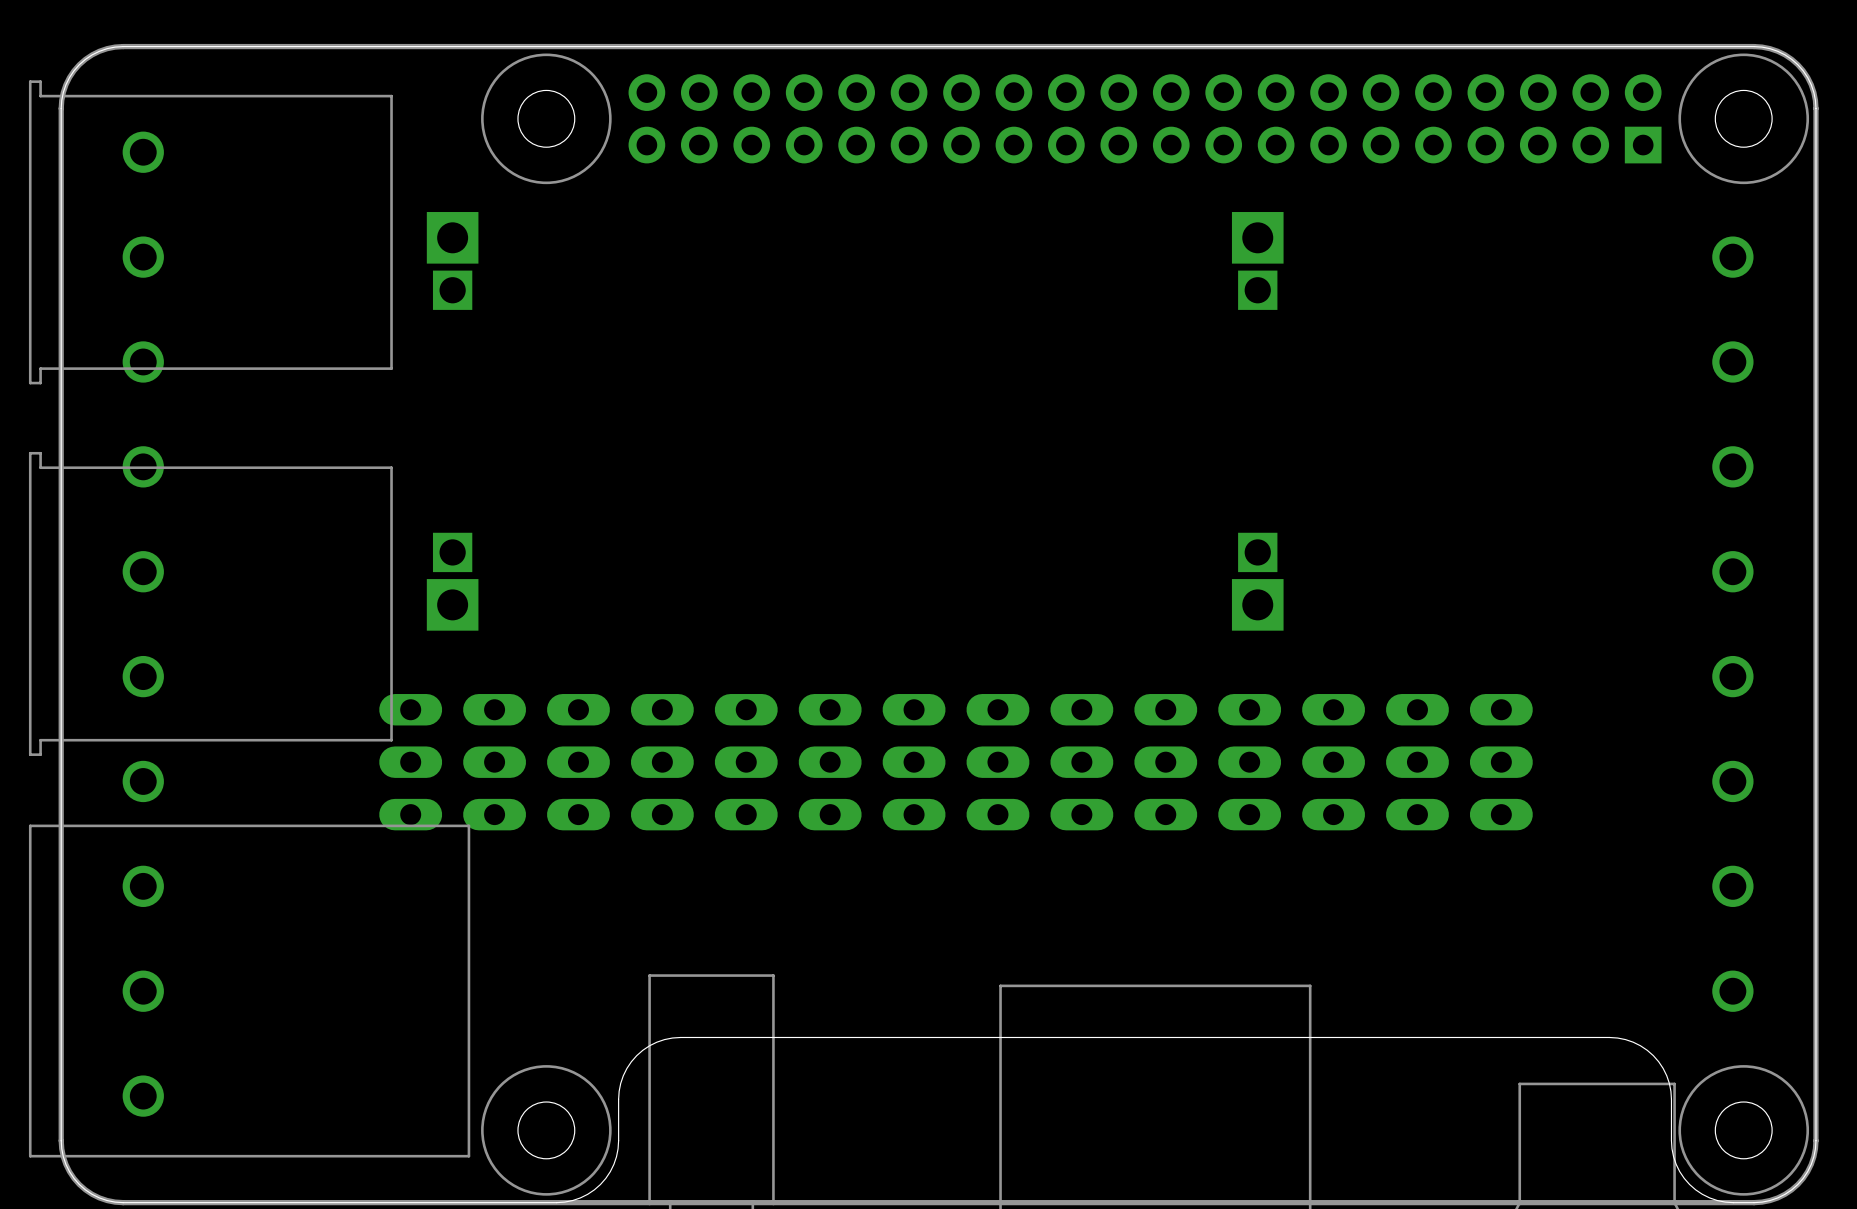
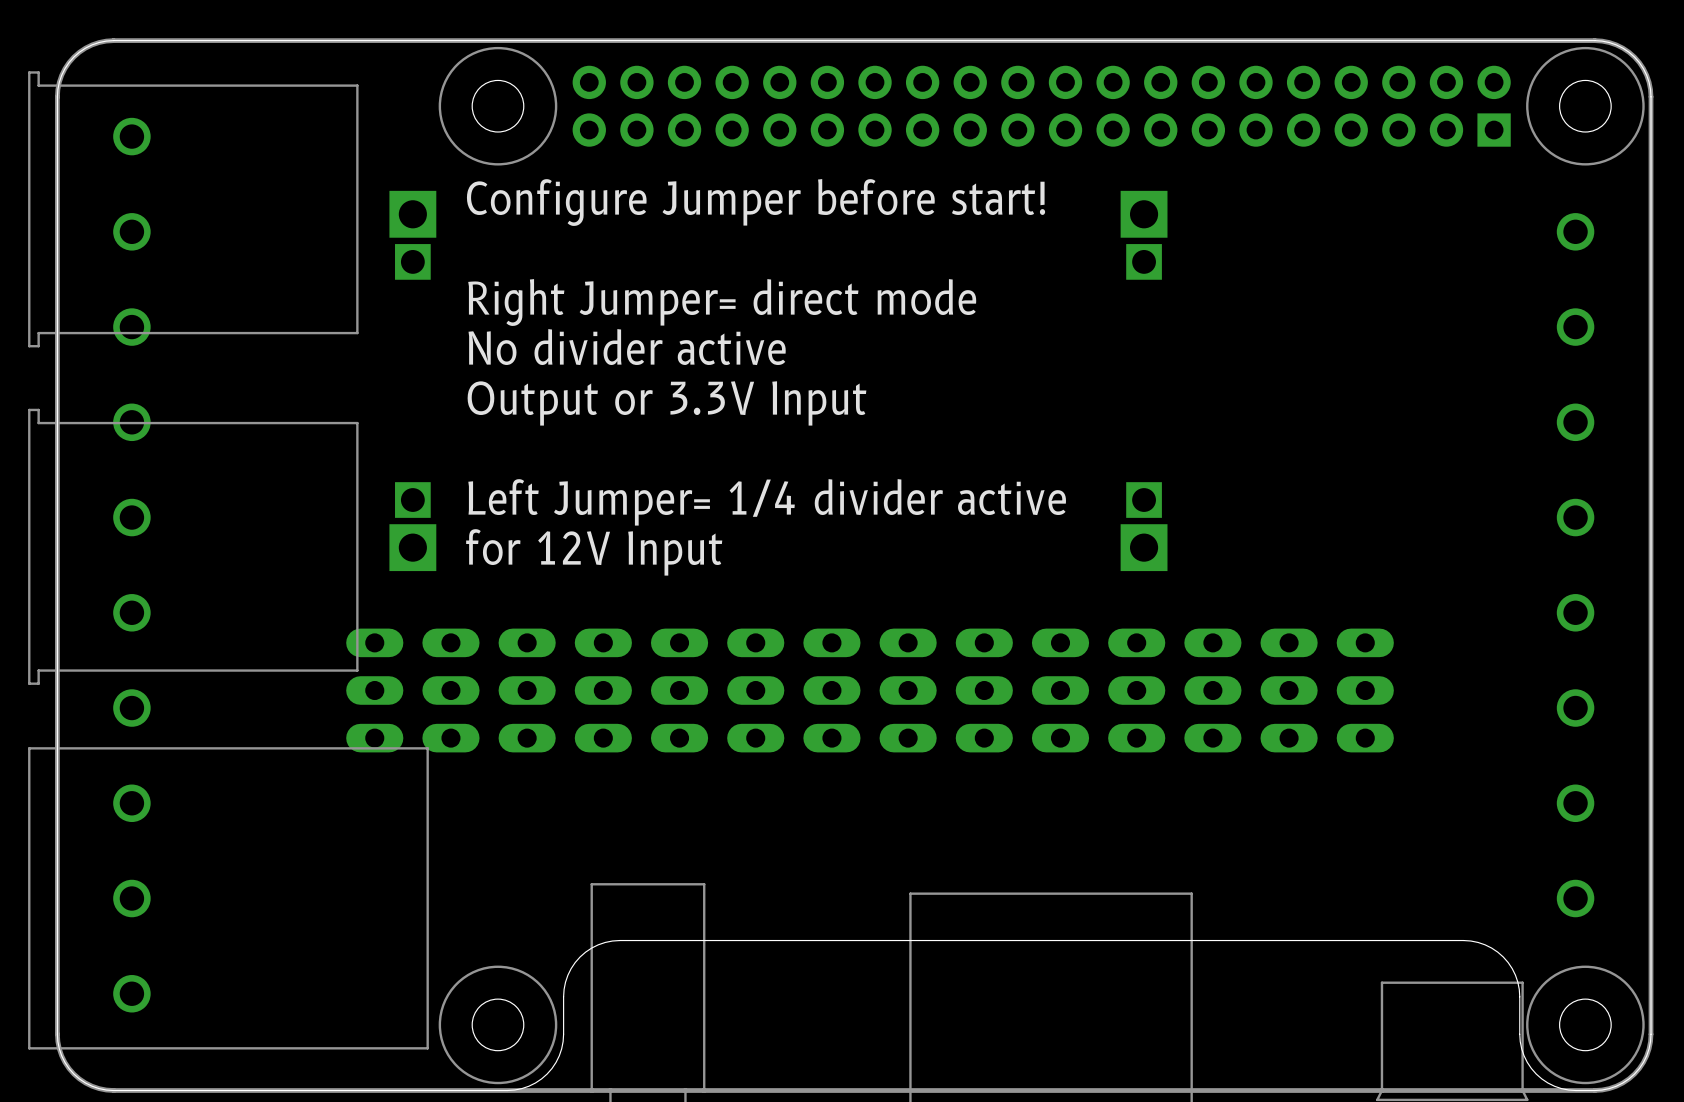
text: none -> Configure Jumper before start! (756, 202)
text: none -> Right Jumper= direct mode (722, 302)
text: none -> No divider active (627, 347)
text: none -> Output or 3.3V Input (666, 403)
text: none -> Left Jumper= 1/4 divider active (767, 502)
text: none -> for 12V Input (594, 552)

